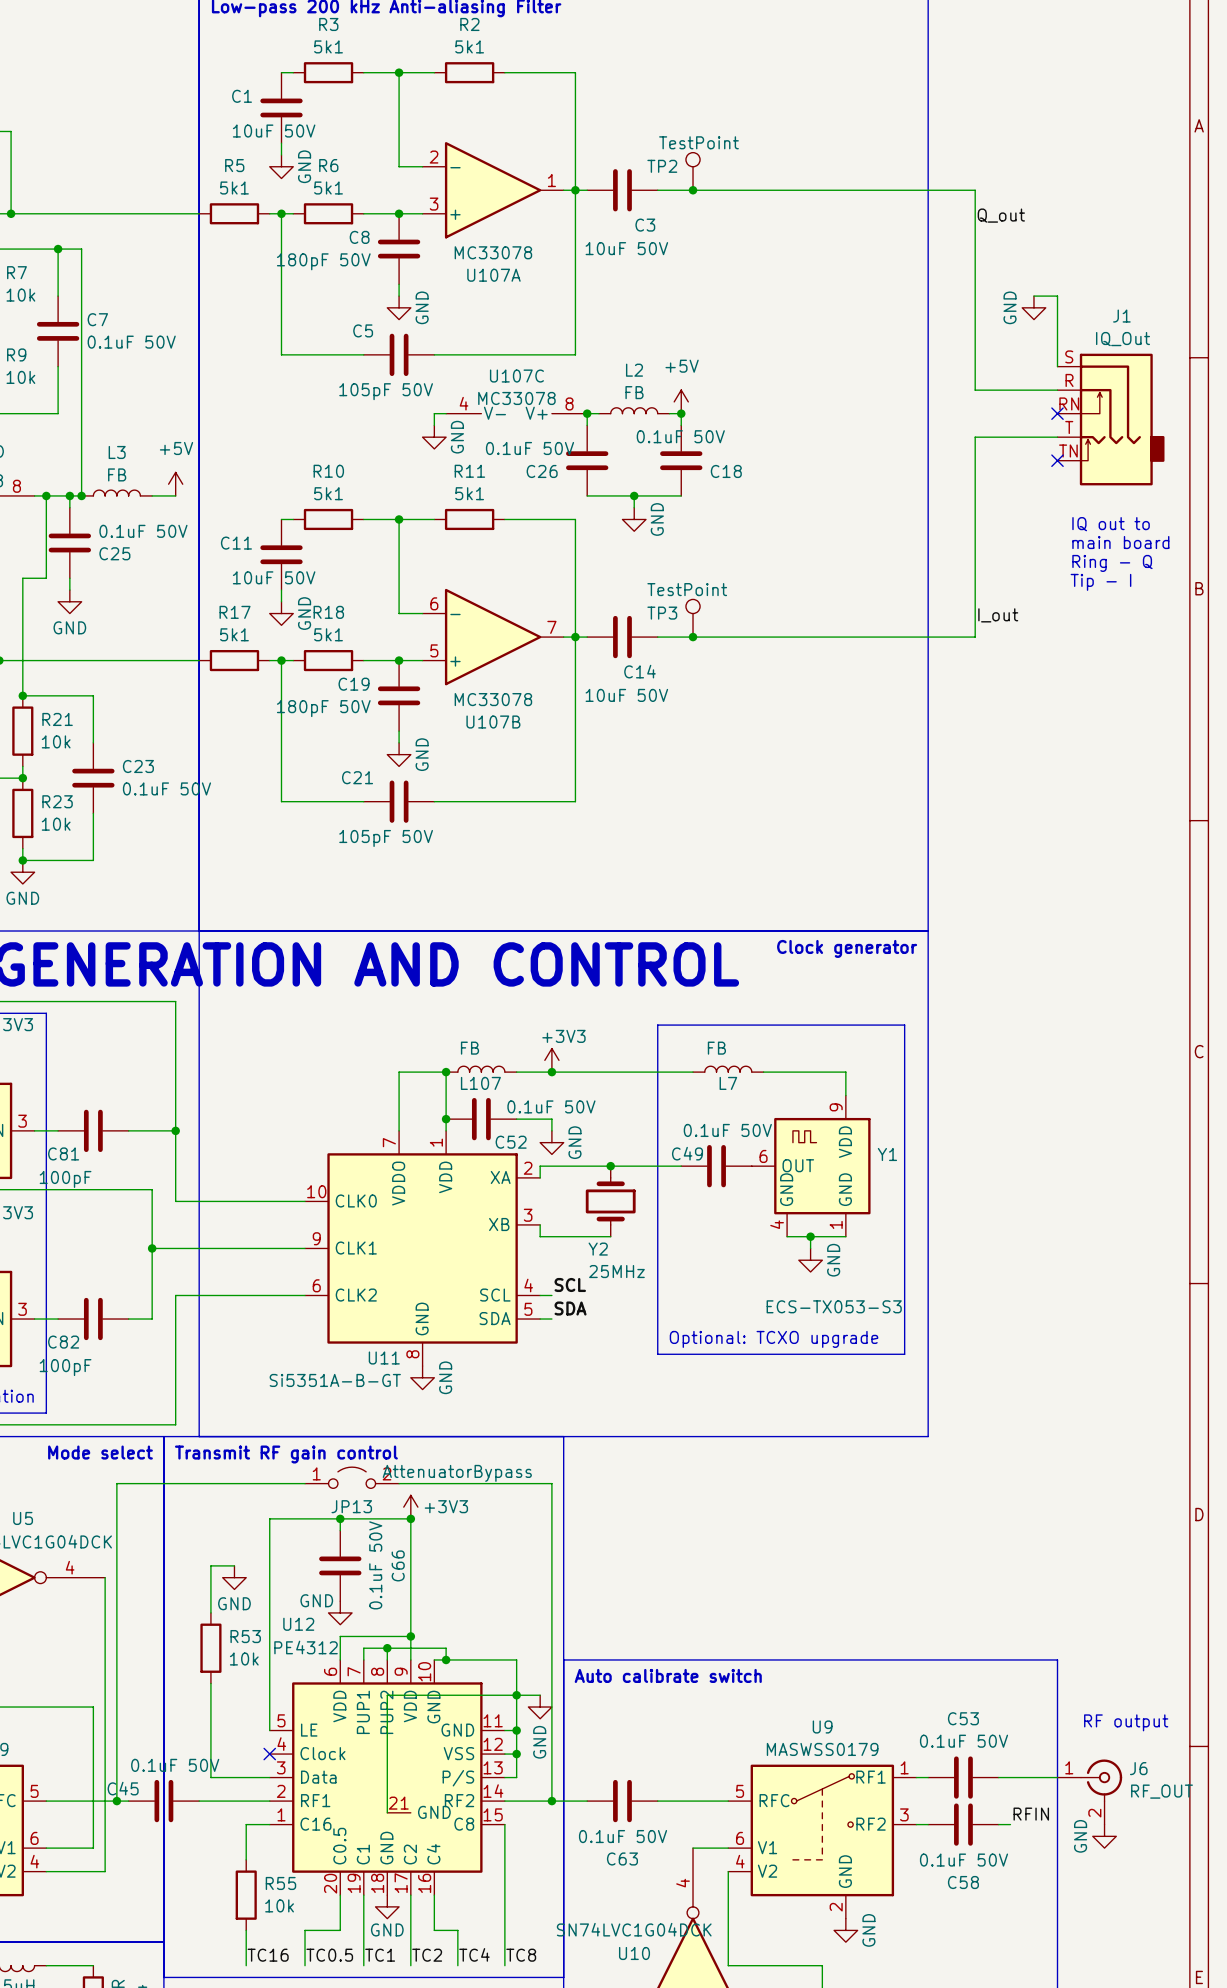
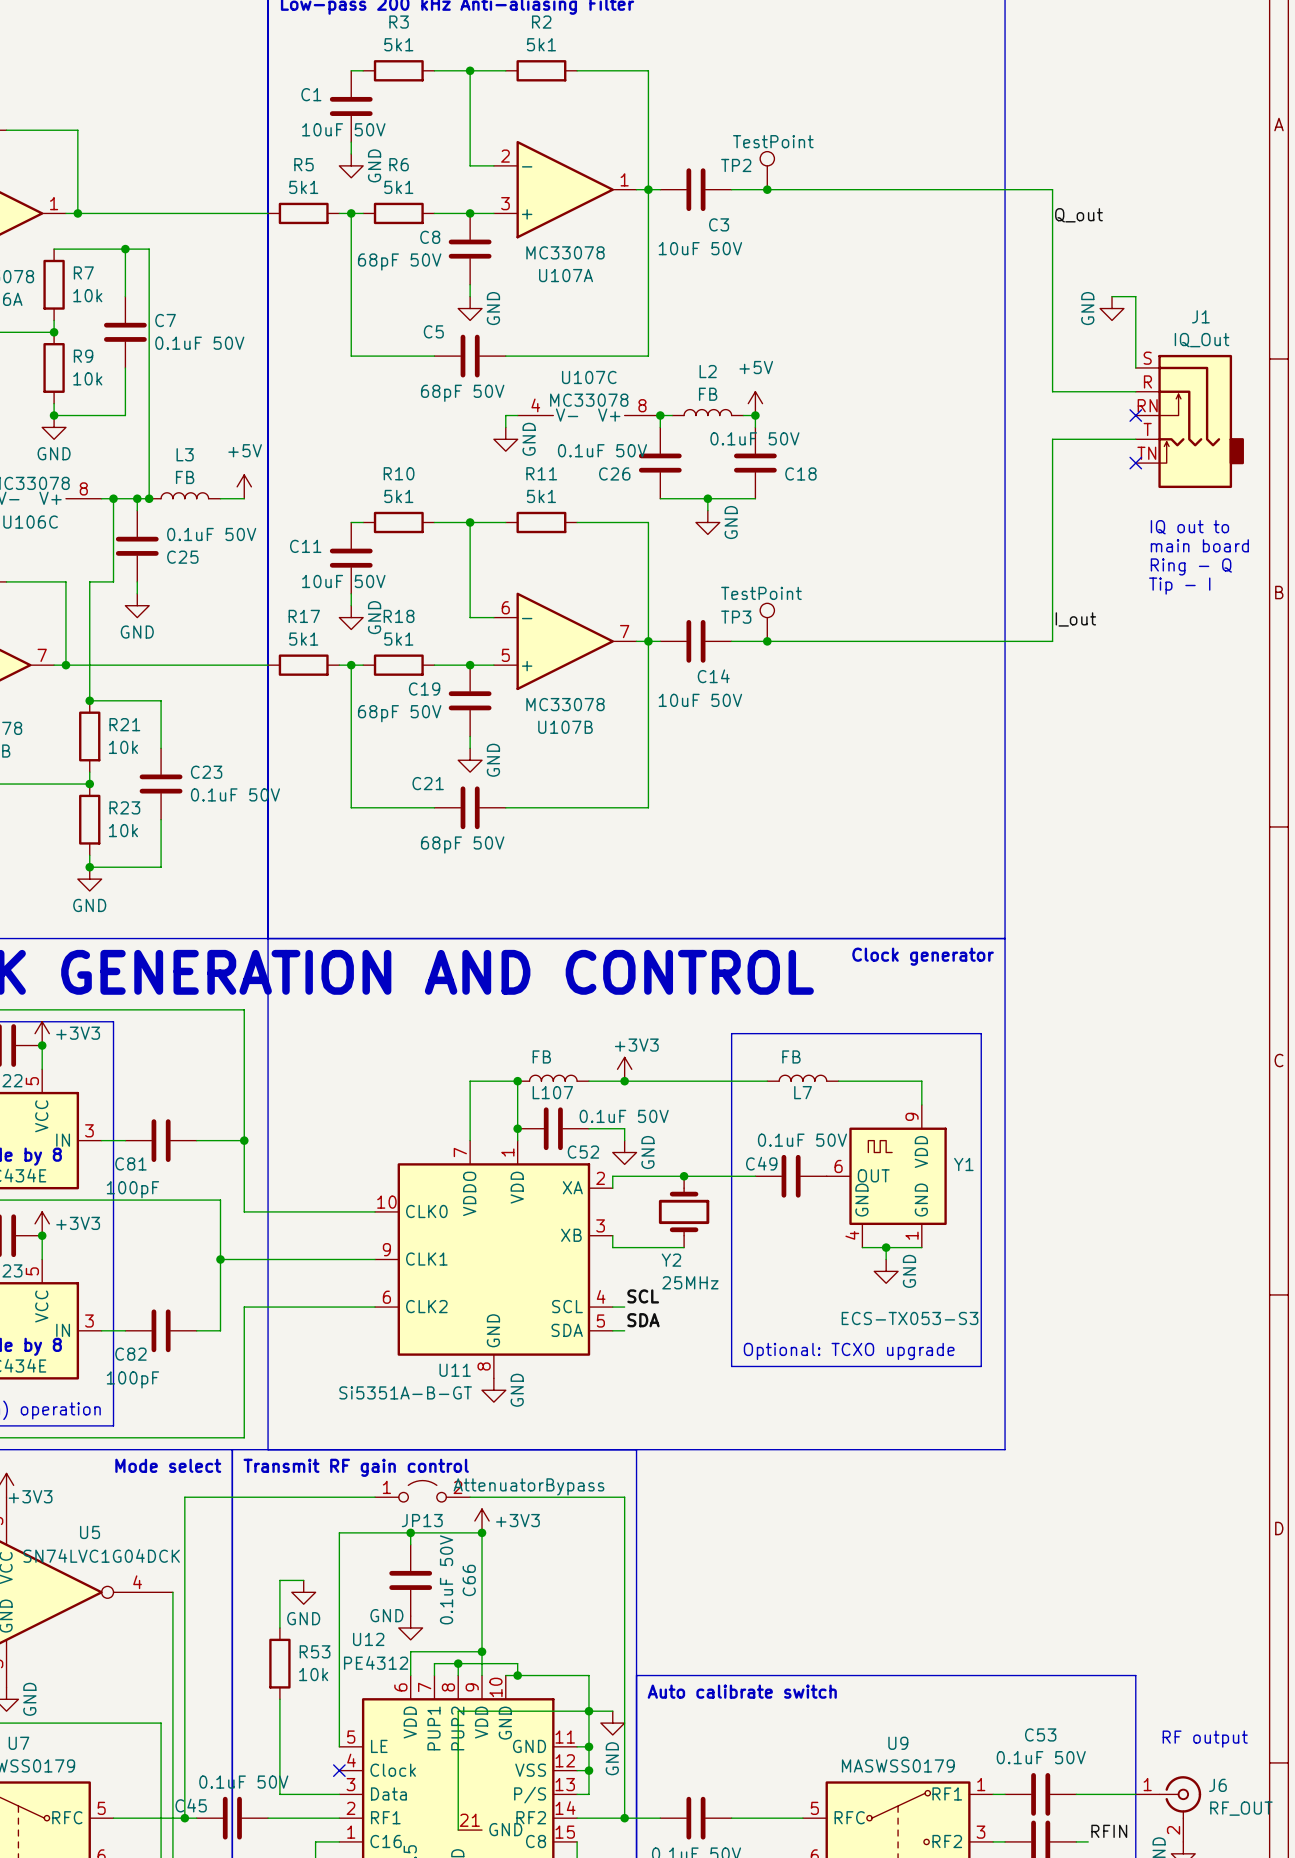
C8 value: 180pF 50V (323, 261) -> 68pF 50V (399, 261)
C5 value: 105pF 50V (386, 391) -> 68pF 50V (462, 393)
C19 value: 180pF 50V (323, 708) -> 68pF 50V (399, 713)
C21 value: 105pF 50V (386, 838) -> 68pF 50V (462, 844)

